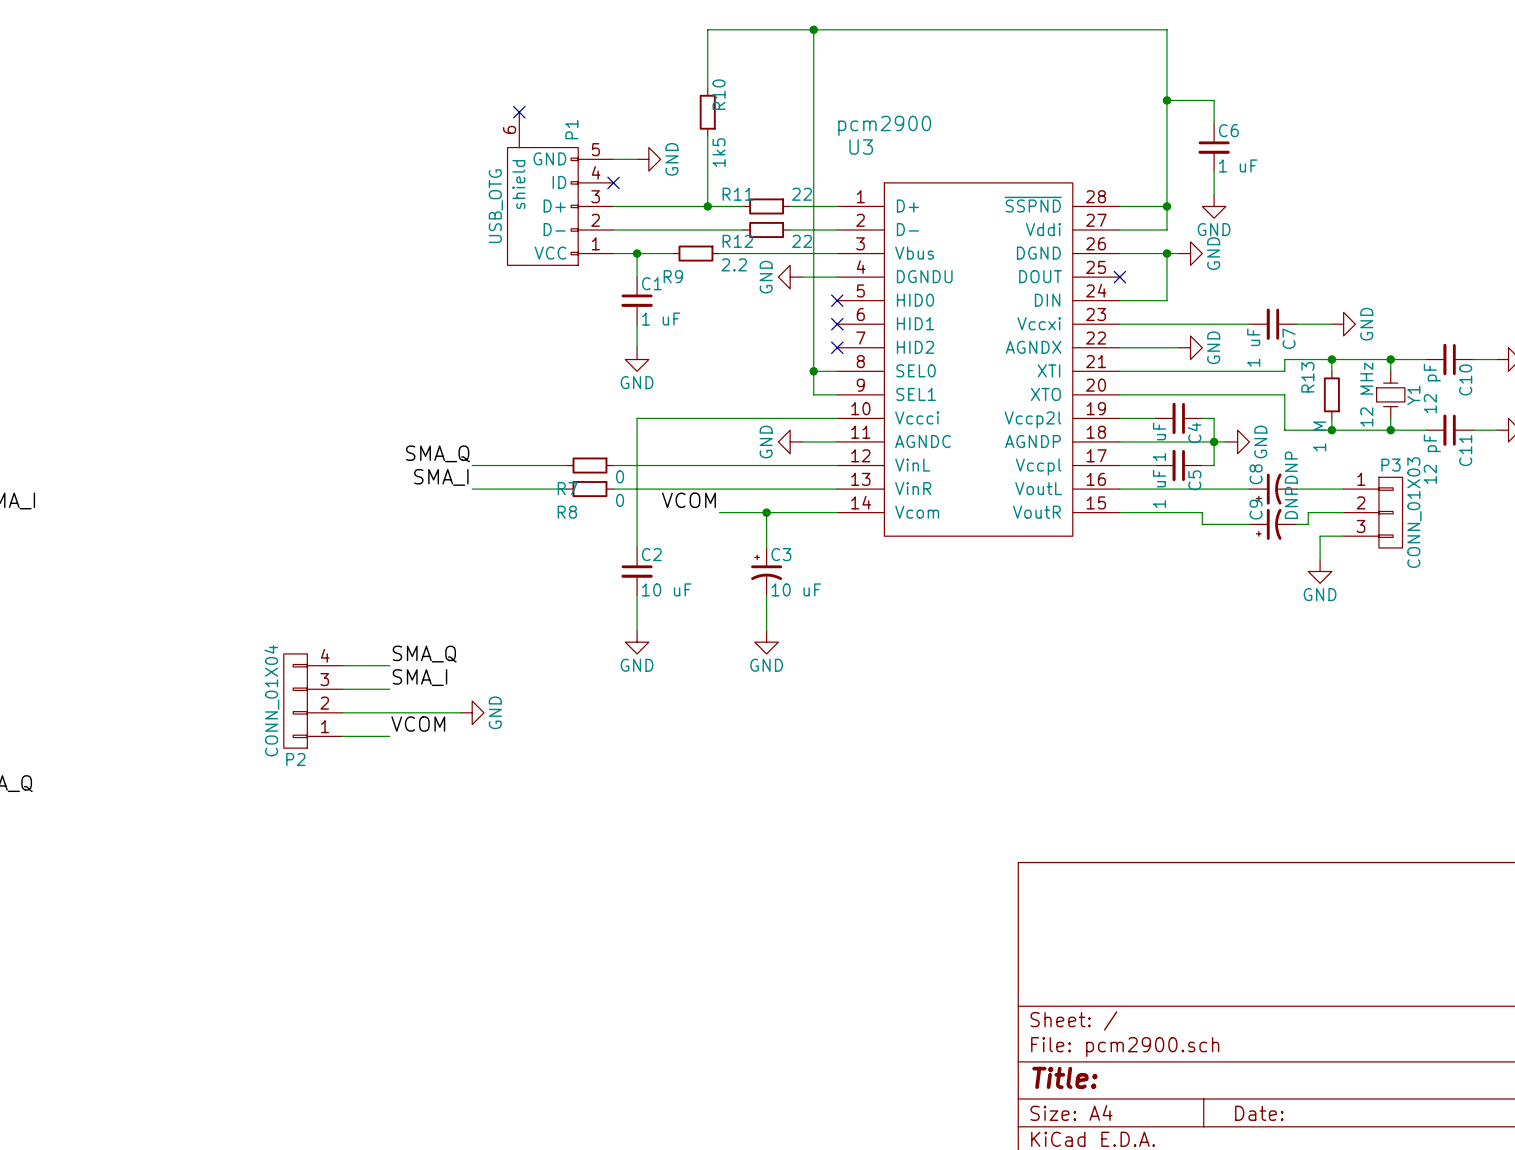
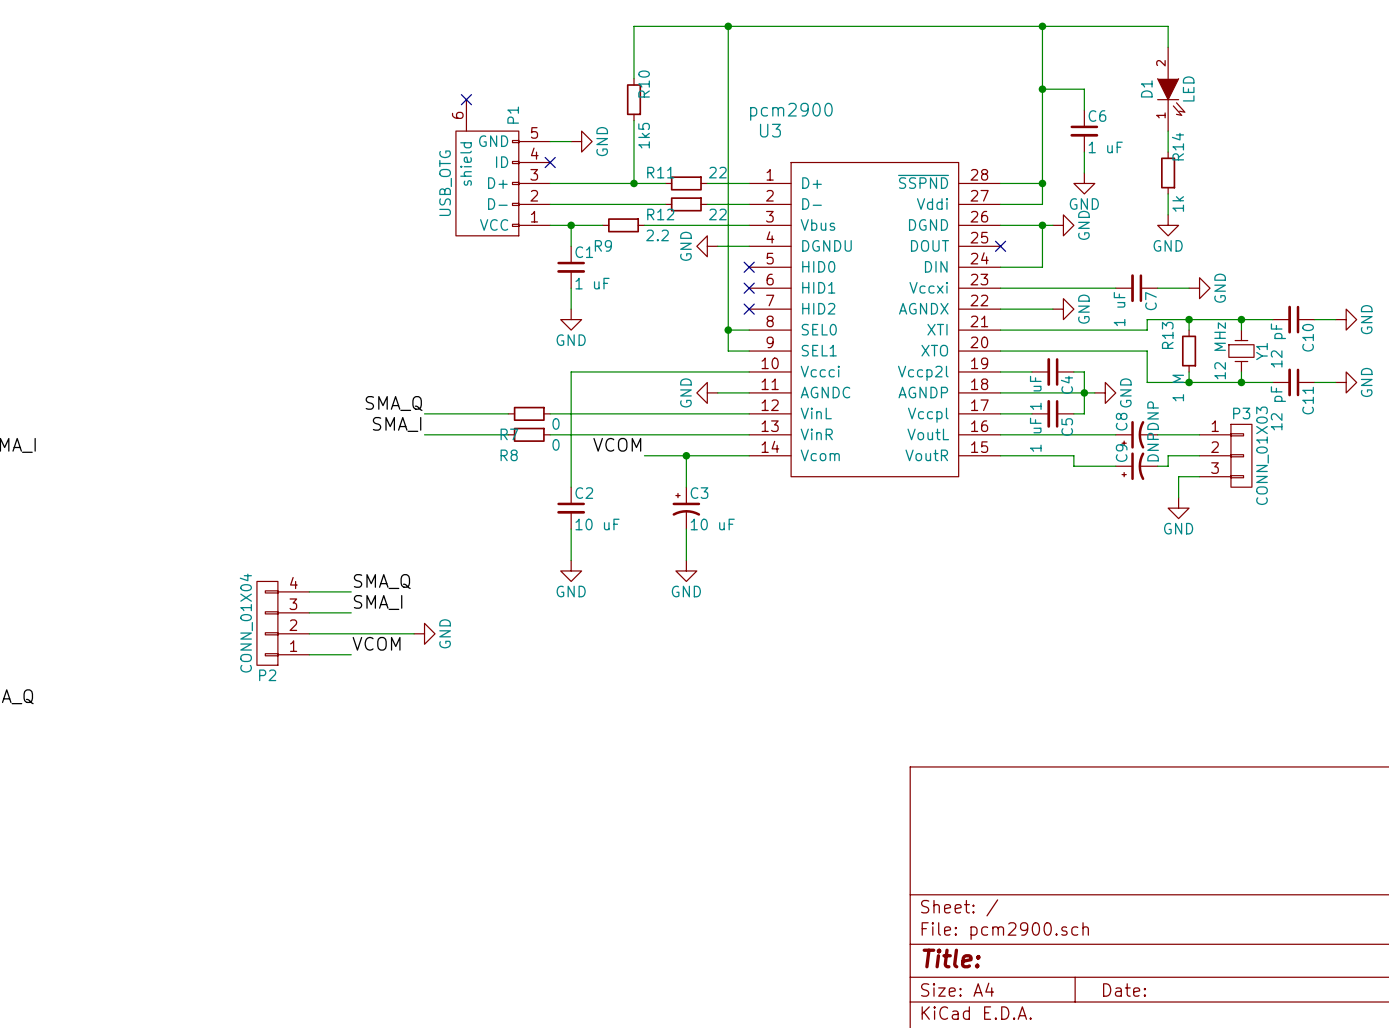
wire: none -> (1042, 26) (1168, 26) (1168, 47)
junction: none -> (1042, 26)
D1: none -> LED (1171, 89)
wire: none -> (1168, 131) (1168, 152)
R14: none -> 1k (1168, 172)
wire: none -> (1168, 193) (1168, 214)
power symbol: none -> GND (1168, 225)

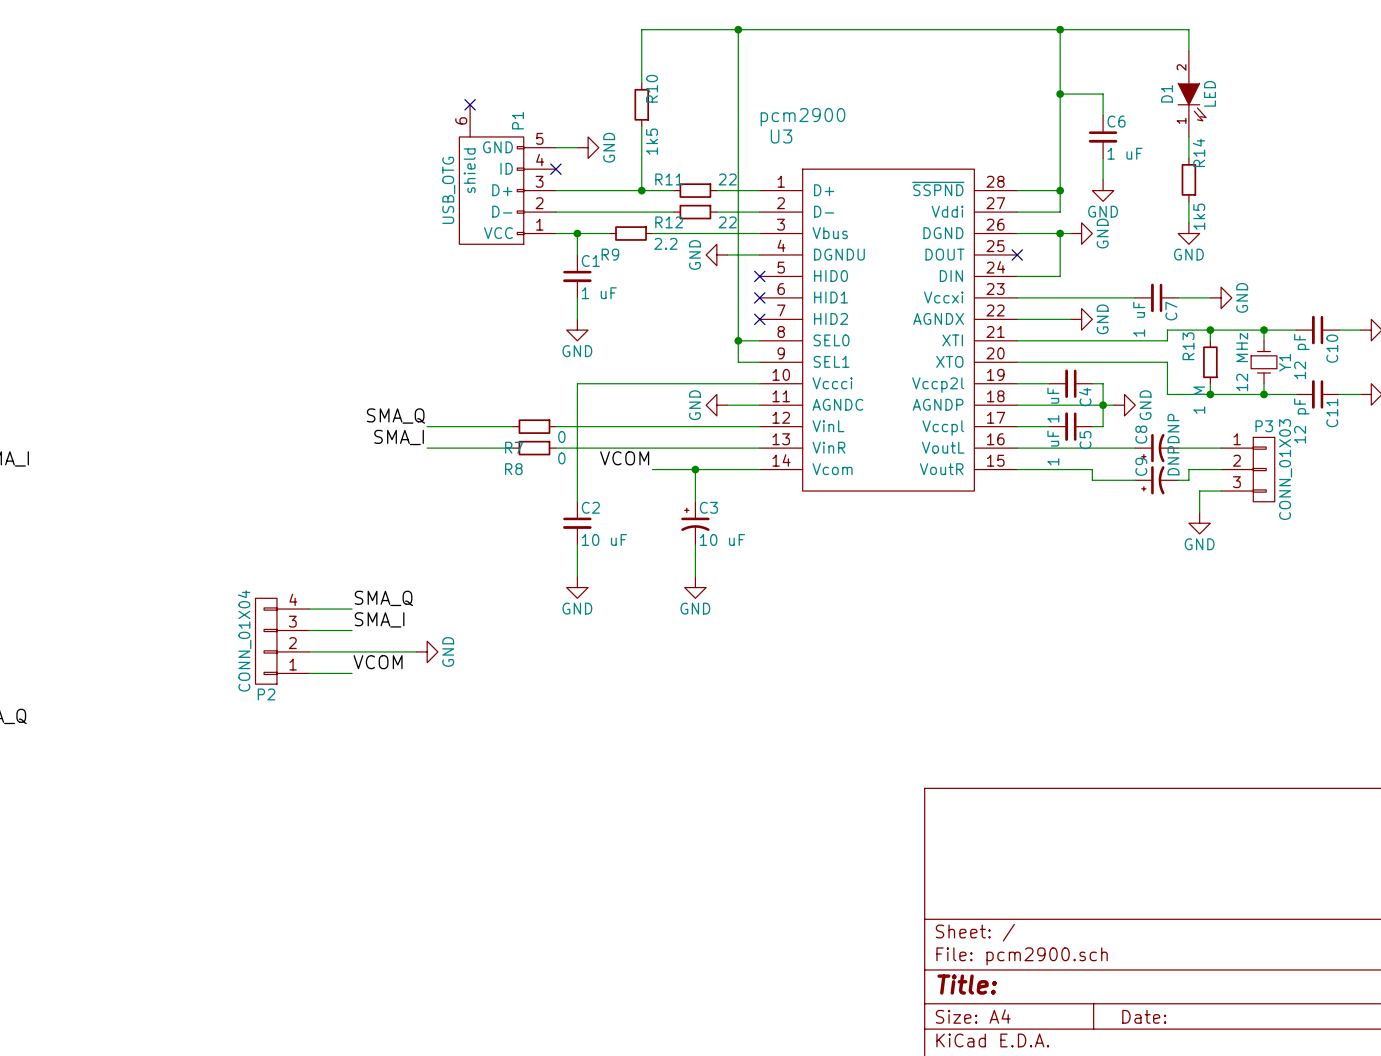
R14 value: 1k (1178, 203) -> 1k5 (1199, 216)

